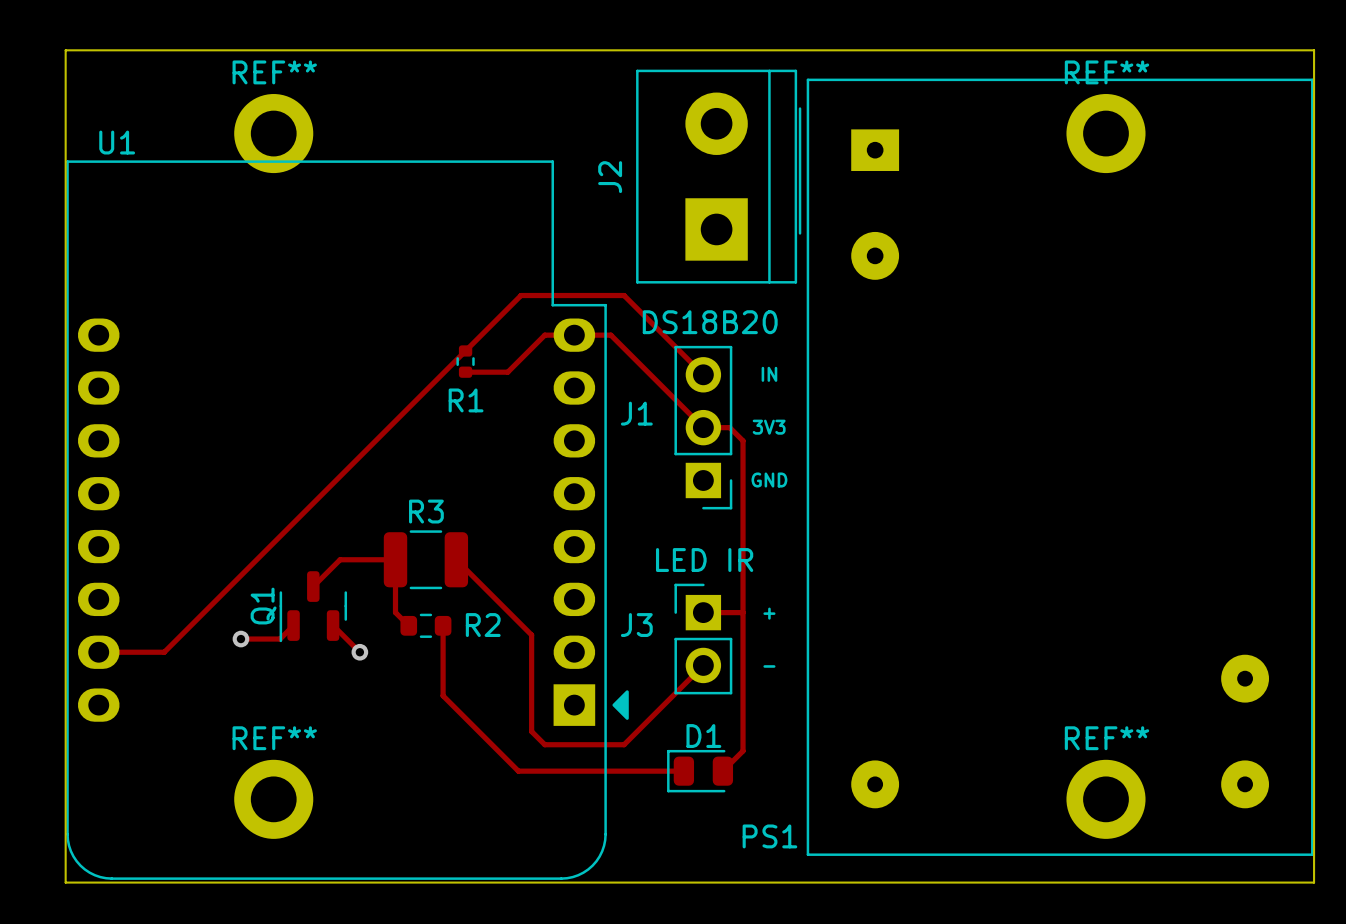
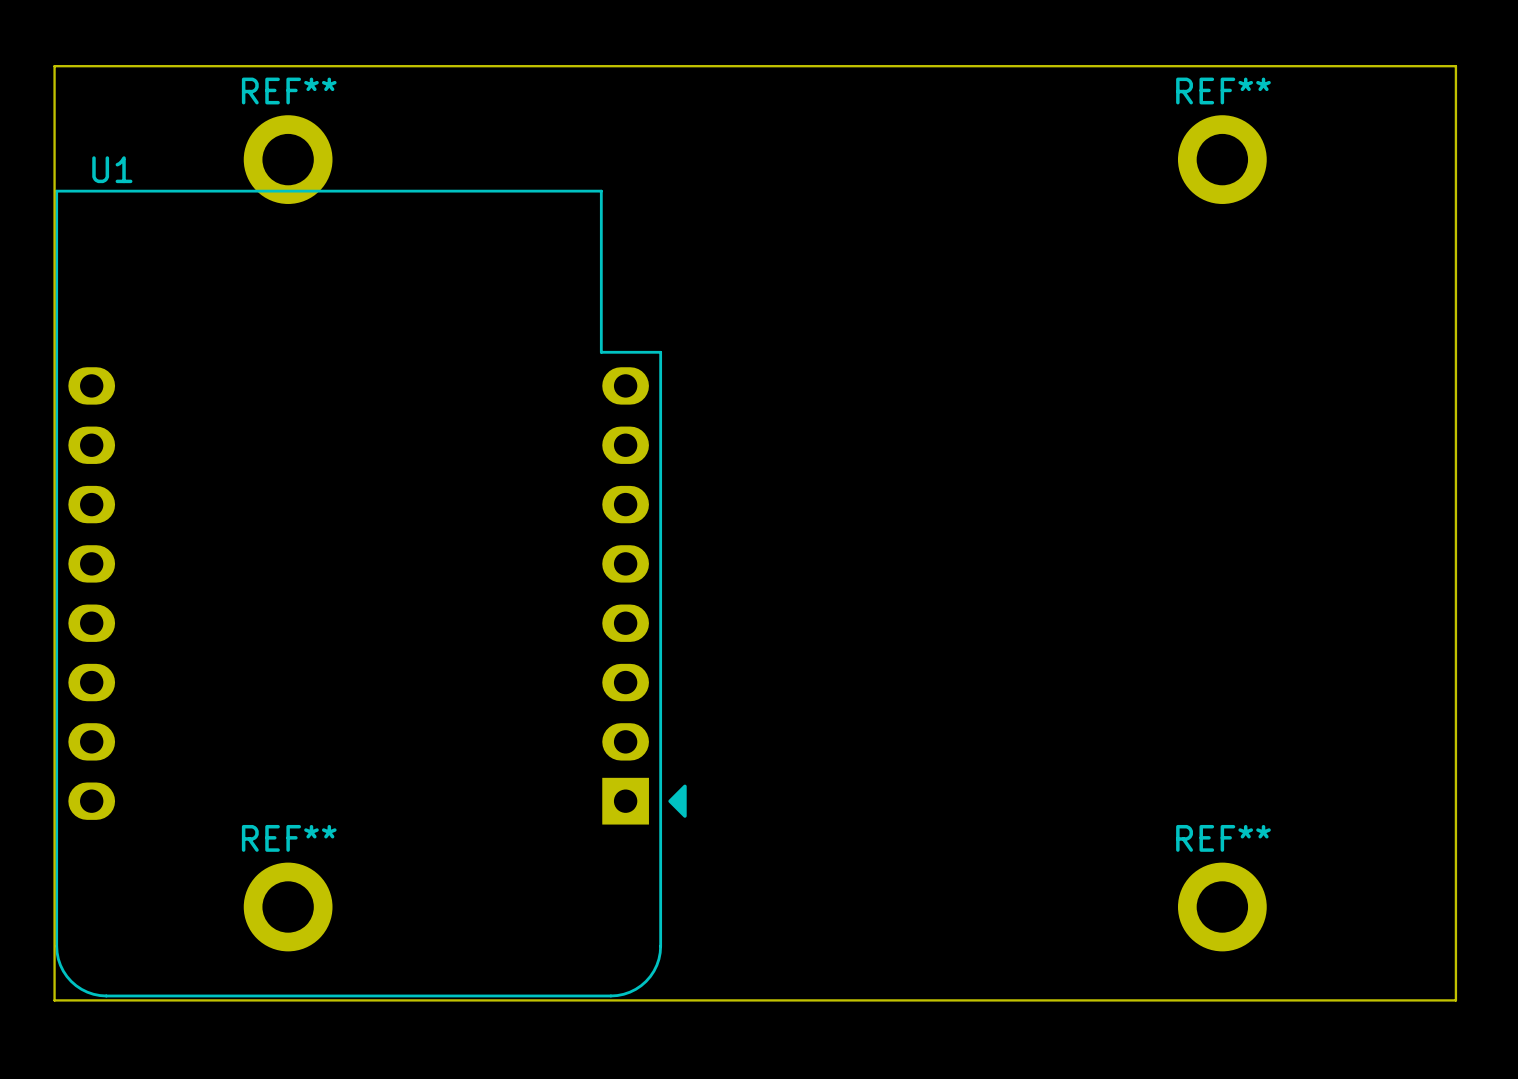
J2: (716, 176) -> none
text: DS18B20 (710, 322) -> none
R1: (465, 361) -> none
track: (465, 372) (507, 372) (544, 335) (610, 335) (703, 427) (729, 427) (743, 440) (743, 751) (722, 771) -> none
track: (703, 374) (624, 295) (521, 295) (164, 652) (98, 652) -> none
text: IN (769, 374) -> none
J1: (703, 427) -> none
text: 3V3 (769, 427) -> none
PS1: (1056, 467) -> none
text: GND (769, 480) -> none
R3: (425, 559) -> none
track: (456, 559) (531, 635) (531, 731) (544, 744) (624, 744) (703, 665) -> none
text: LED IR (704, 560) -> none
track: (313, 586) (340, 559) (395, 559) (395, 612) (408, 625) -> none
Q1: (313, 606) -> none
track: (703, 612) (743, 612) -> none
text: + (769, 613) -> none
track: (293, 625) (280, 639) (240, 639) -> none
track: (333, 625) (359, 652) -> none
R2: (425, 625) -> none
track: (443, 625) (443, 695) (518, 771) (683, 771) -> none
via: (240, 639) -> none
J3: (703, 639) -> none
via: (359, 652) -> none
text: - (769, 666) -> none
D1: (700, 771) -> none

